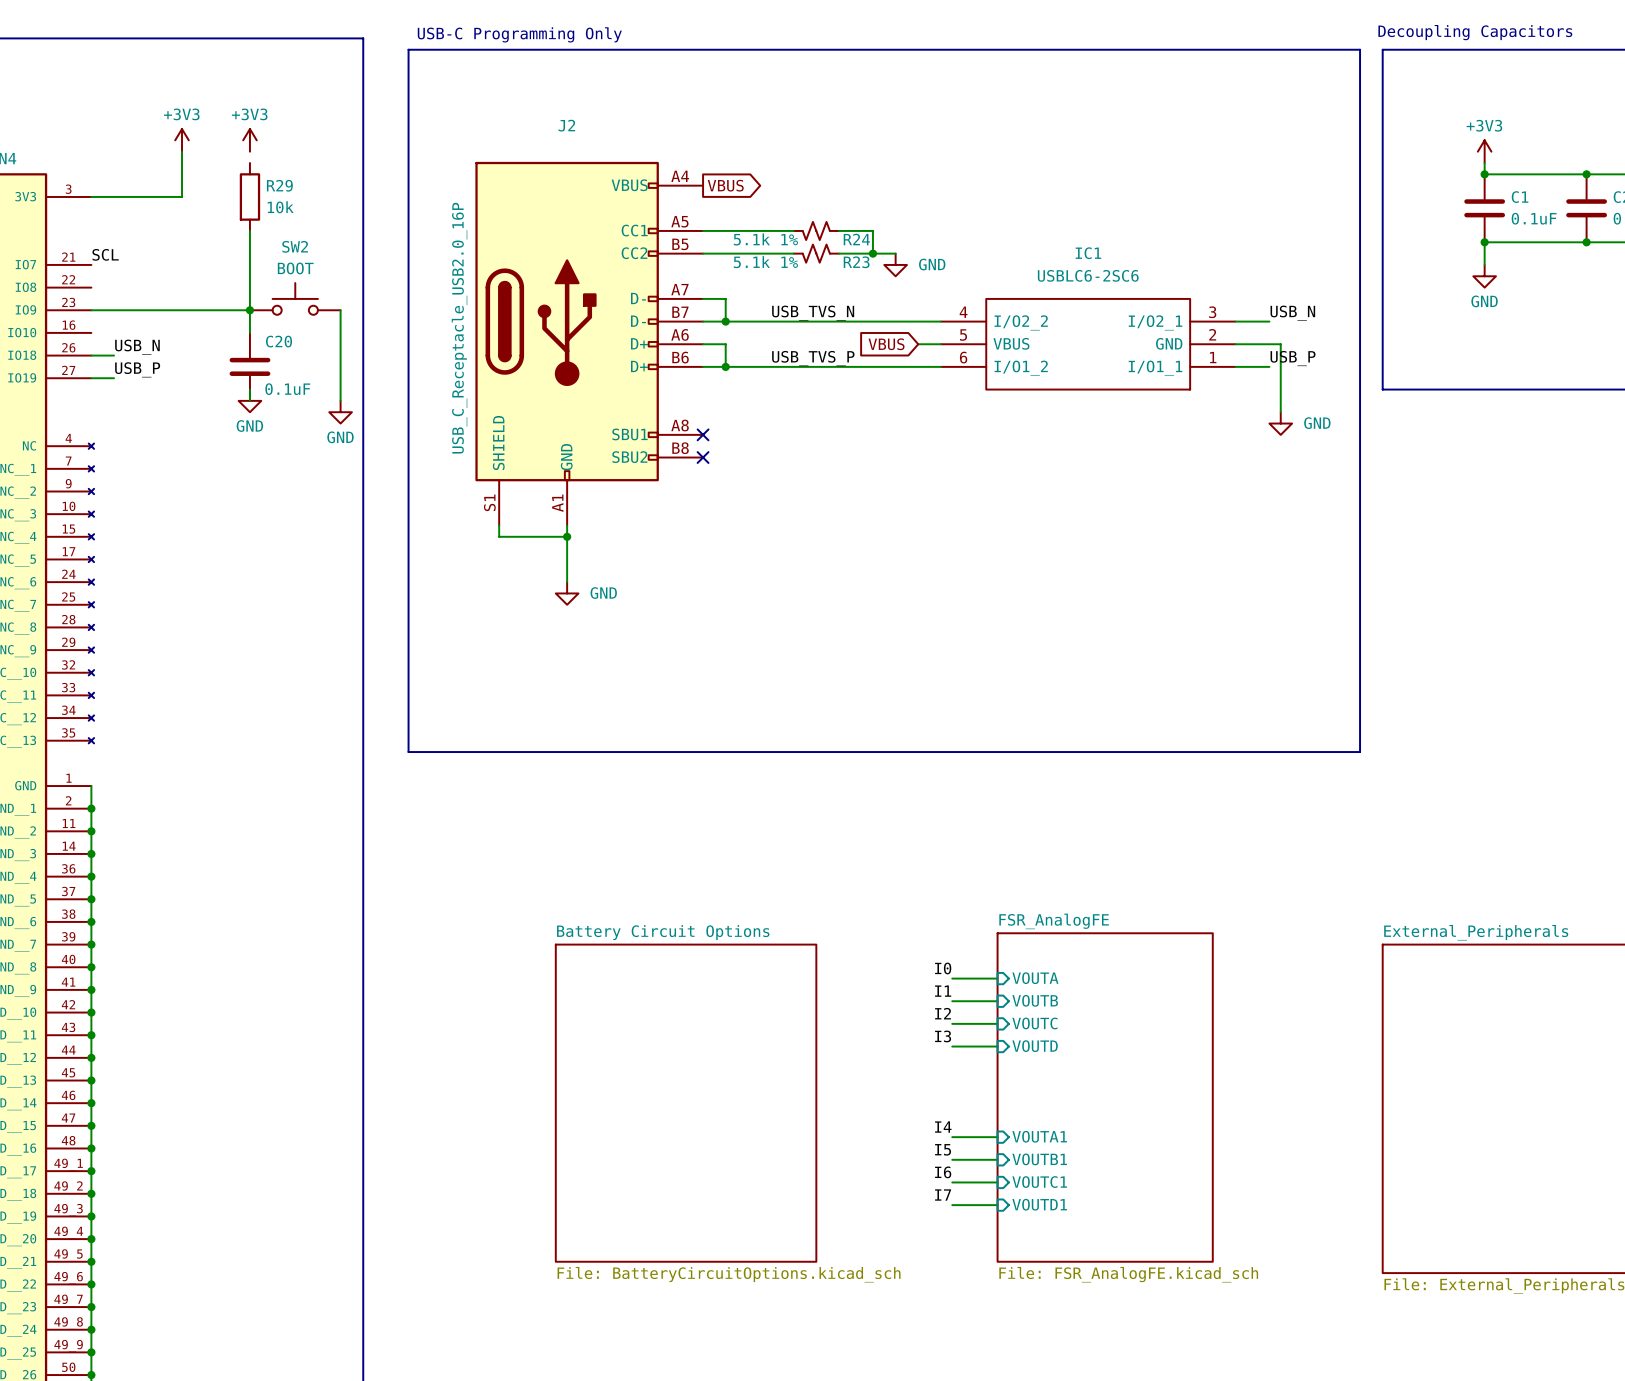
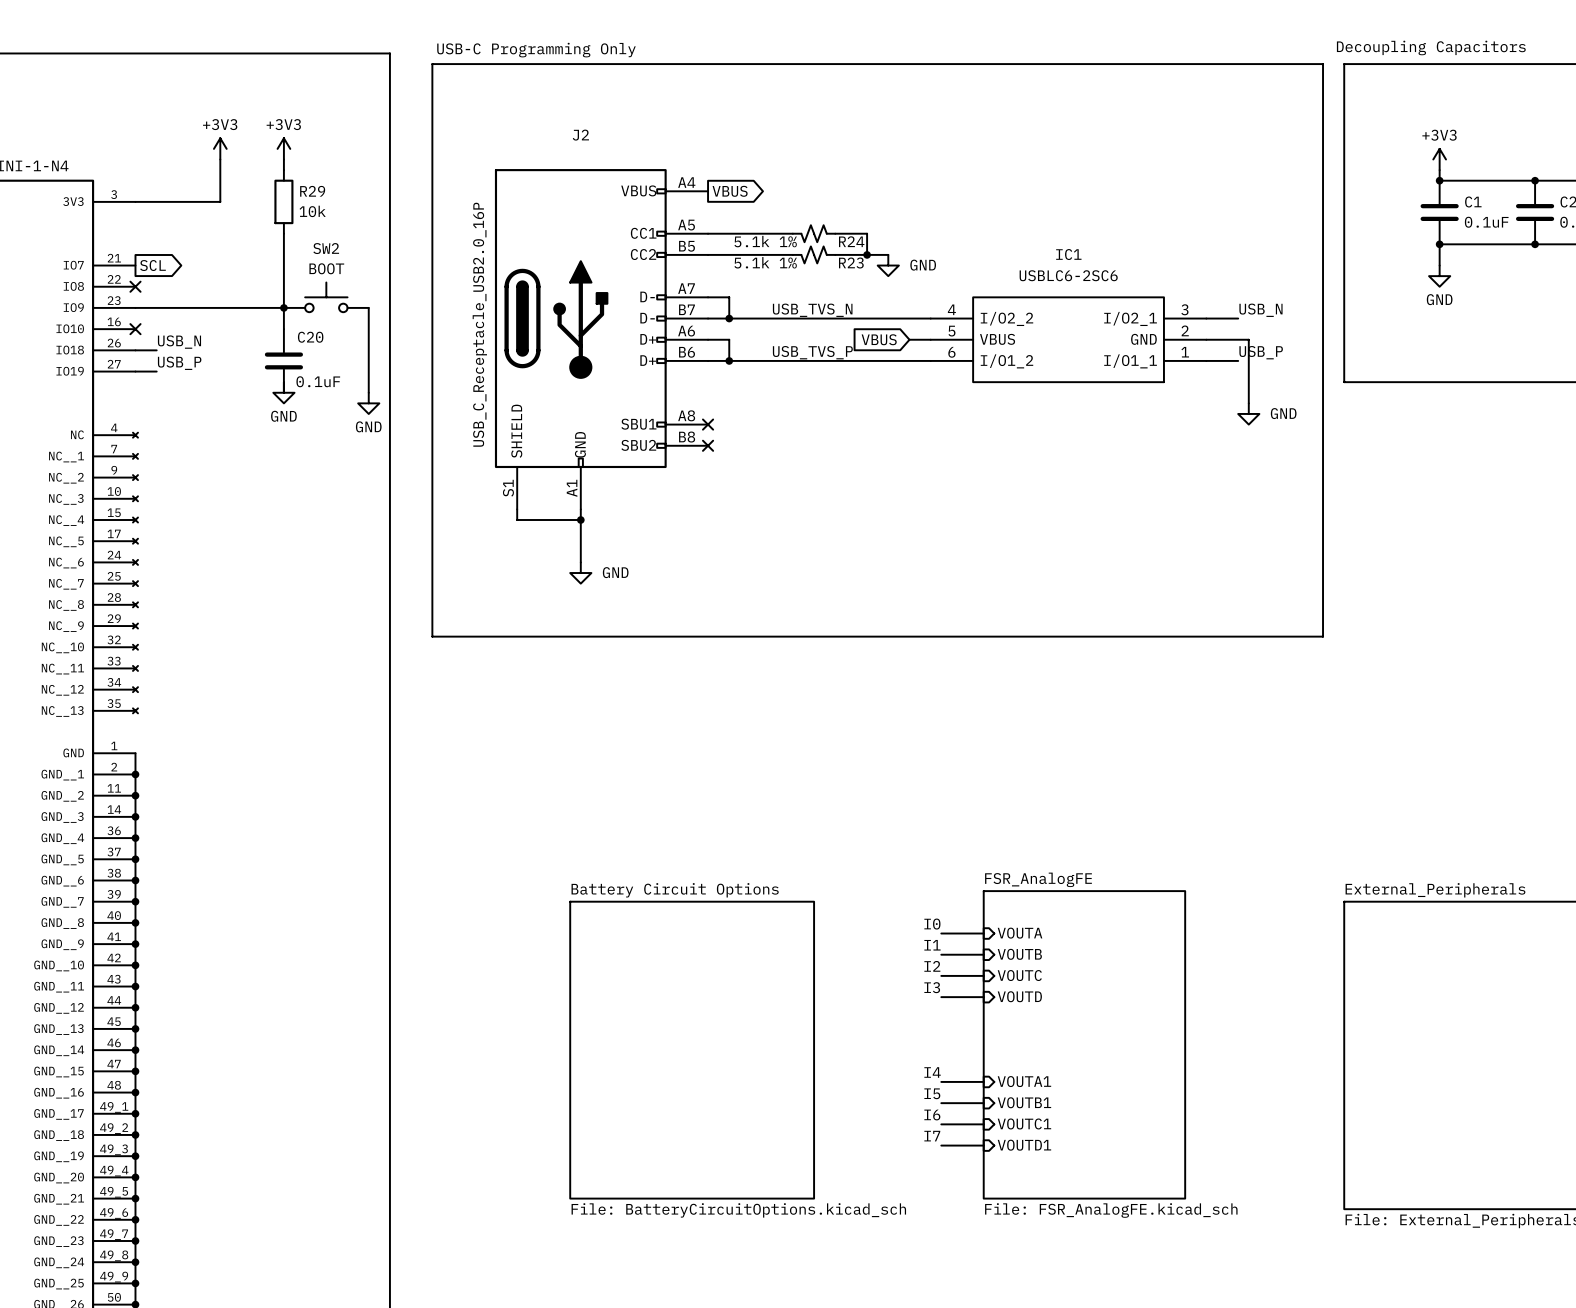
wire: none -> (283, 159) (283, 170)
label: SCL (105, 254) -> none
global label: none -> SCL (152, 265)
no-connect mark: none -> (135, 286)
no-connect mark: none -> (135, 329)
line: (408, 661) (408, 752) (1360, 752) (1360, 661) -> (432, 636) (1323, 636)

